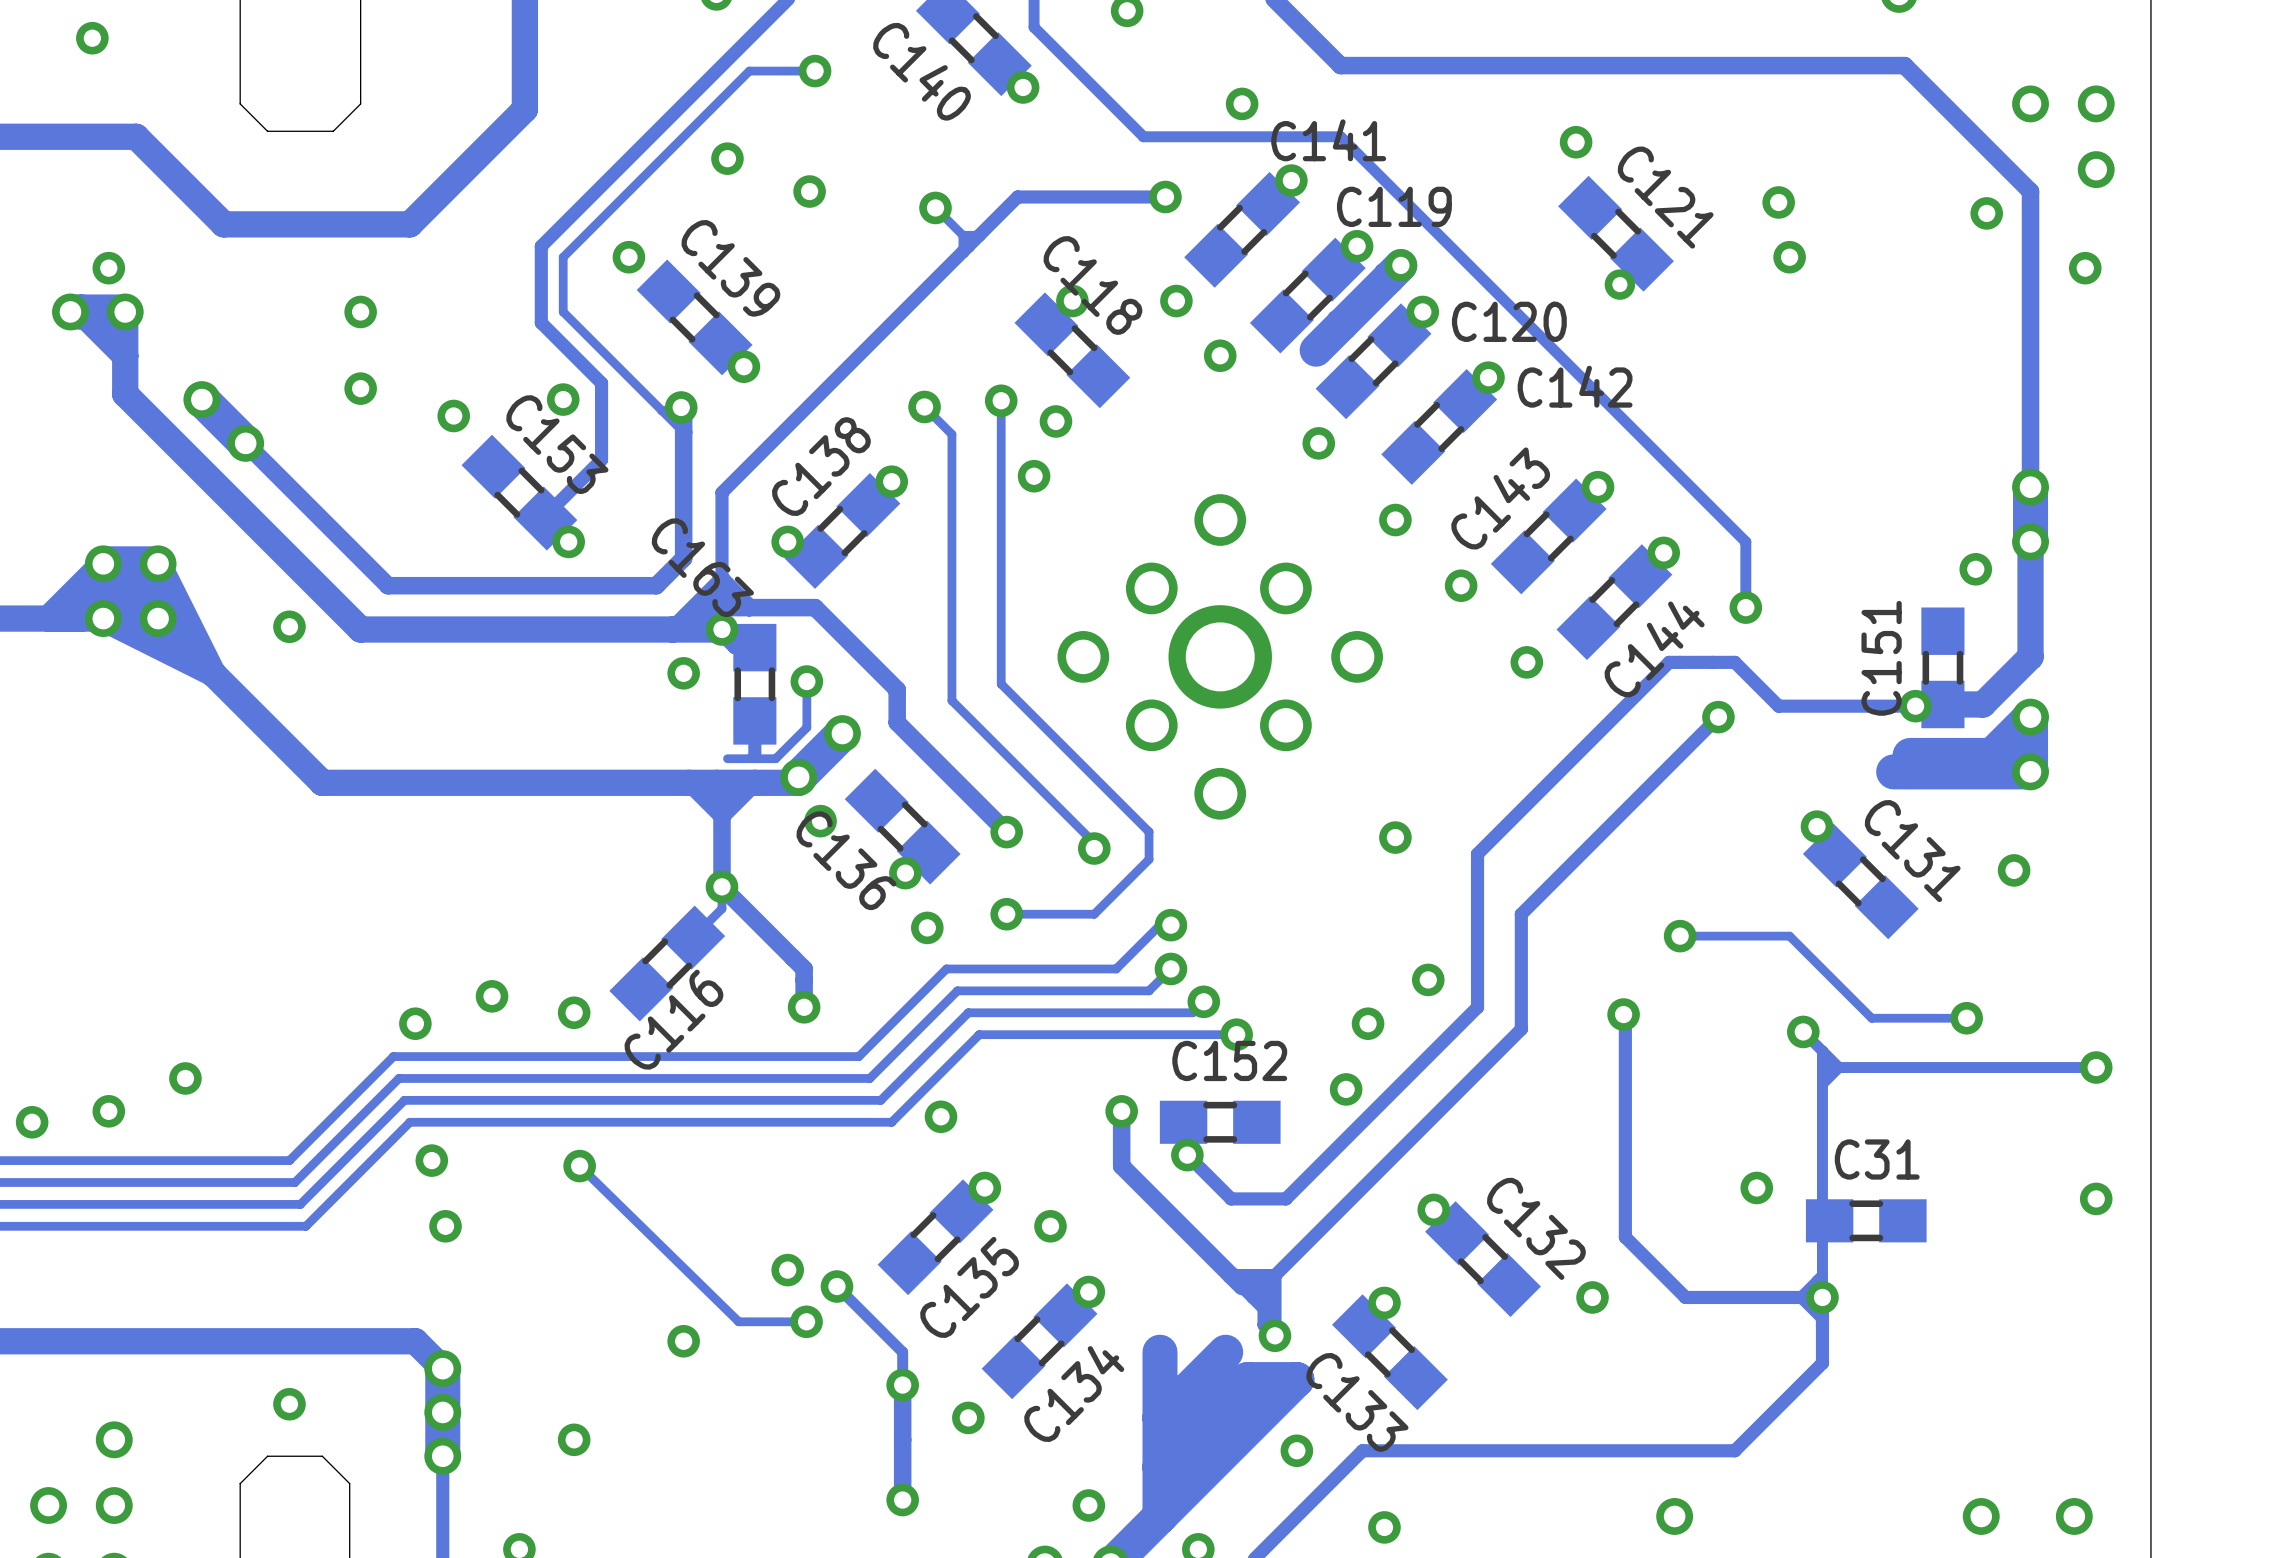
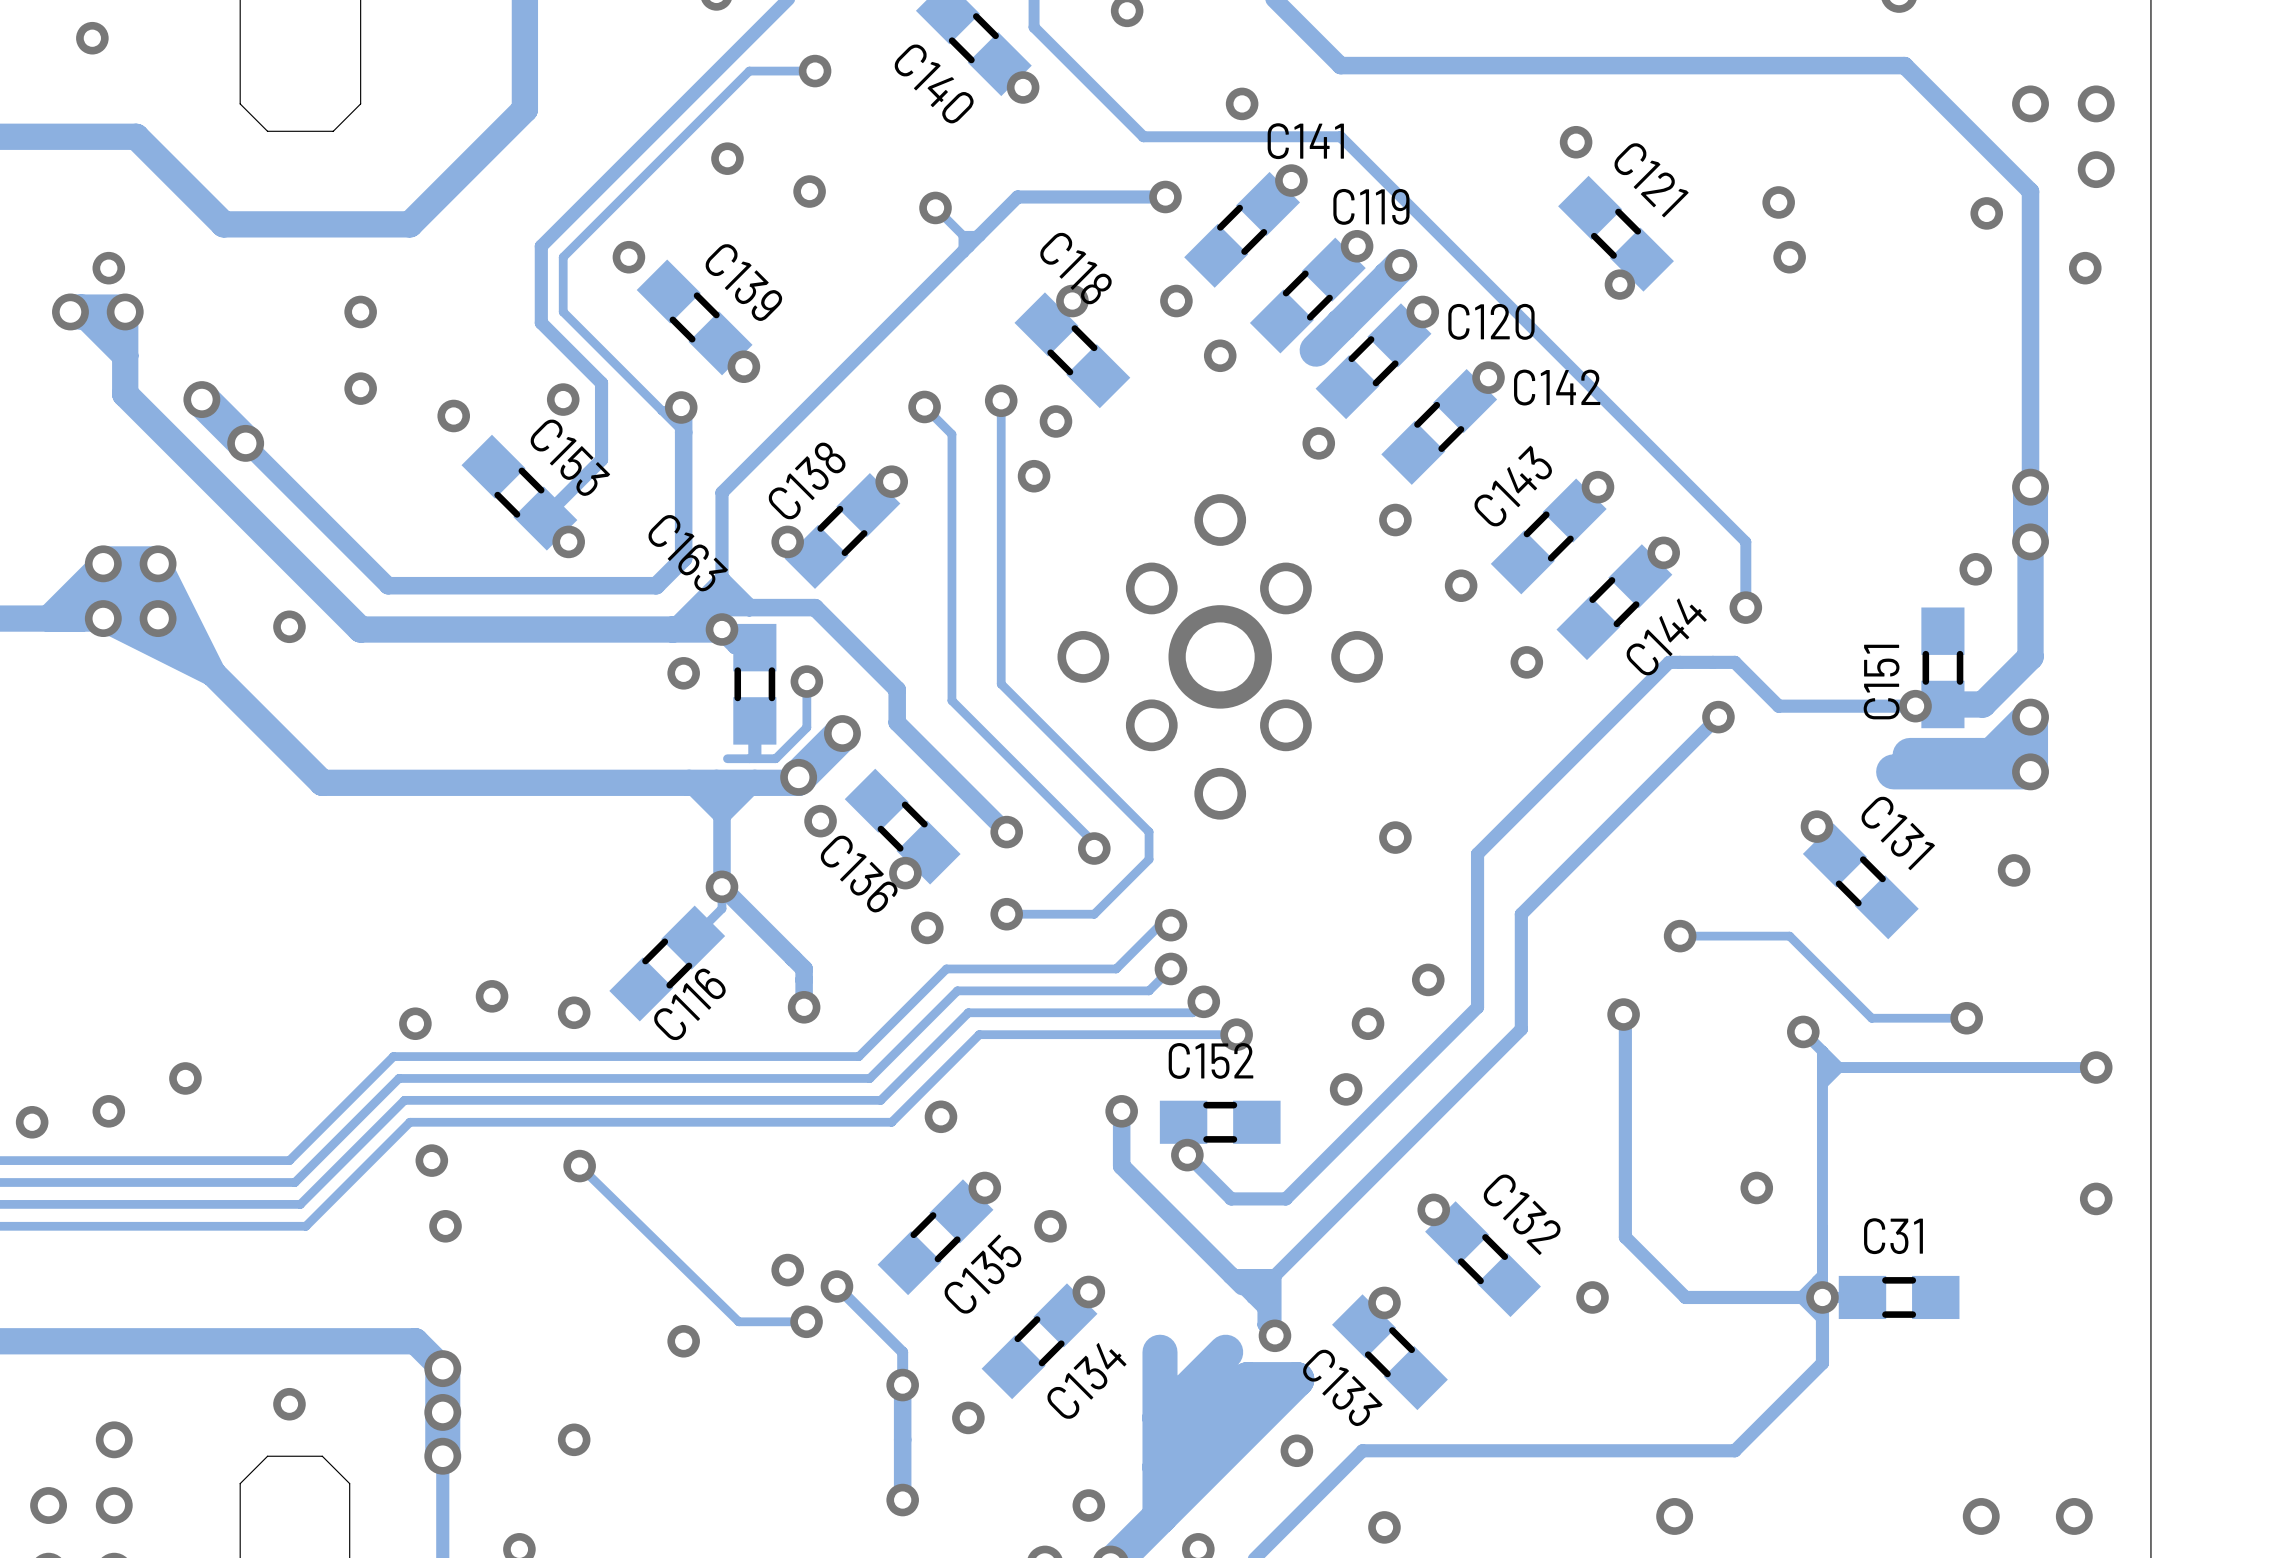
C31 position: (1866, 1220) -> (1899, 1297)

